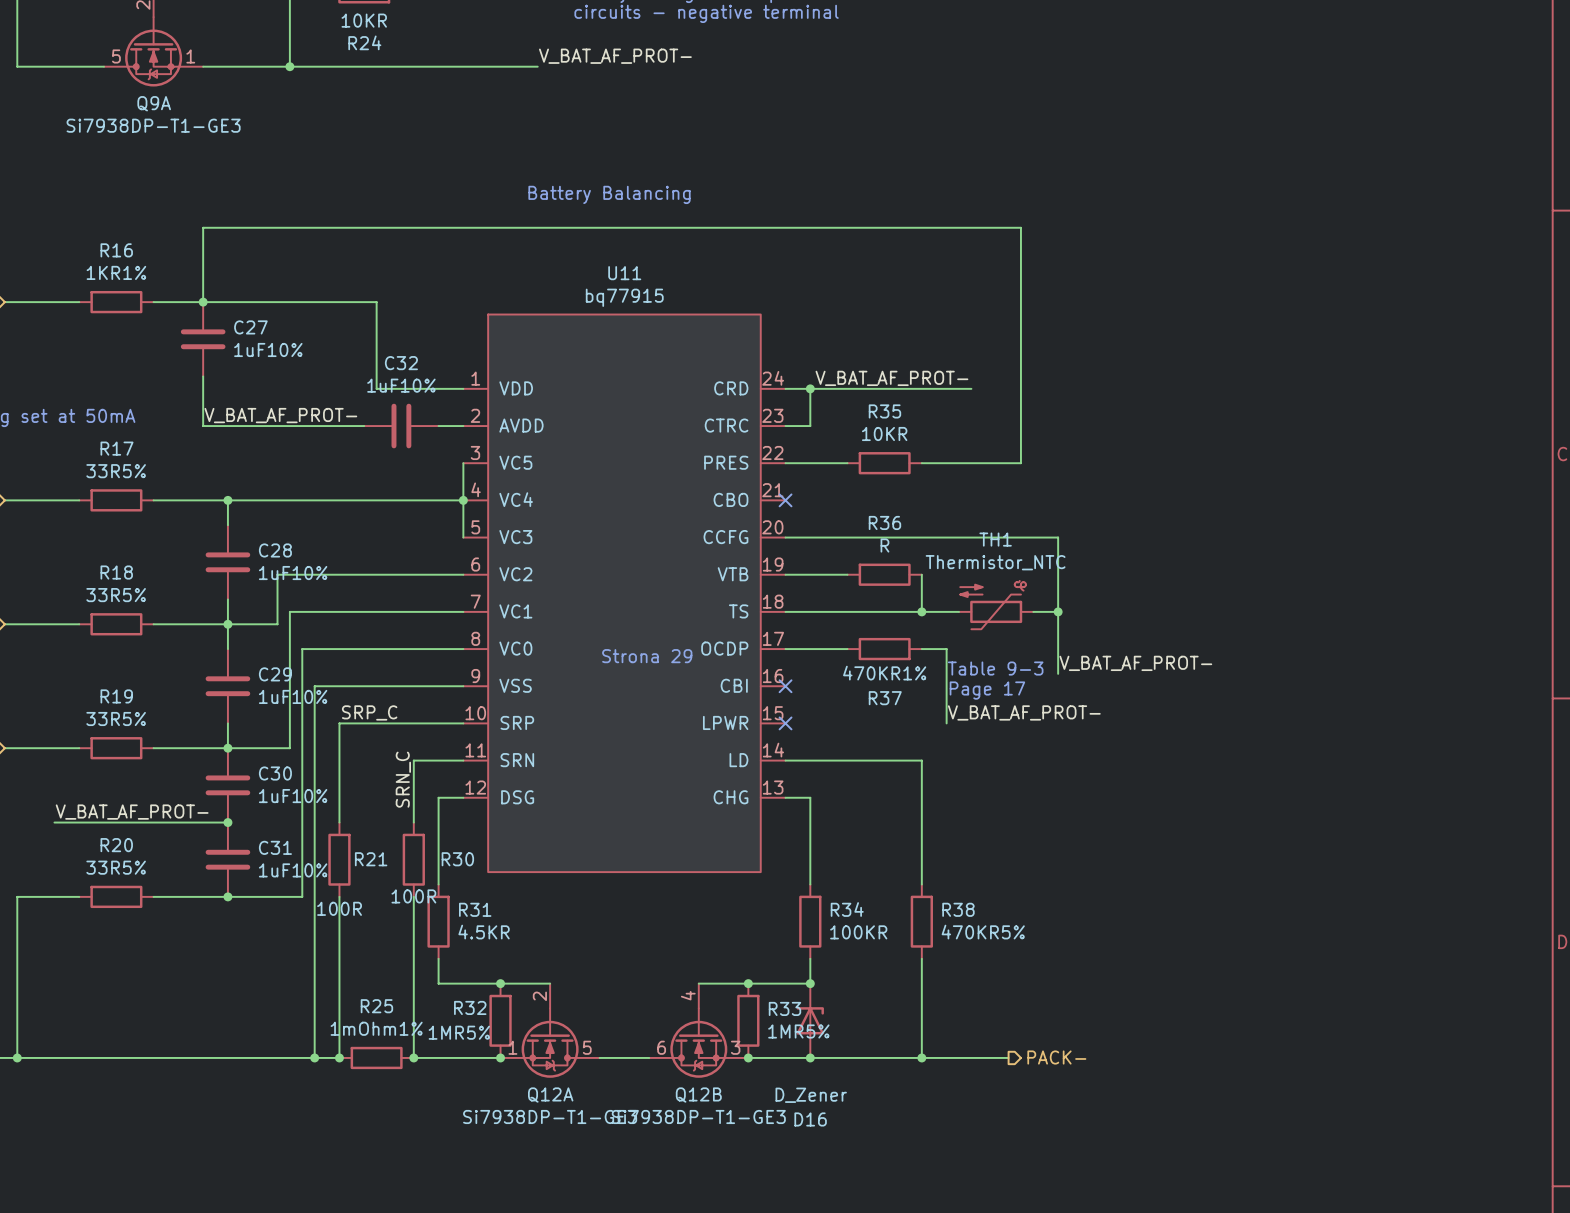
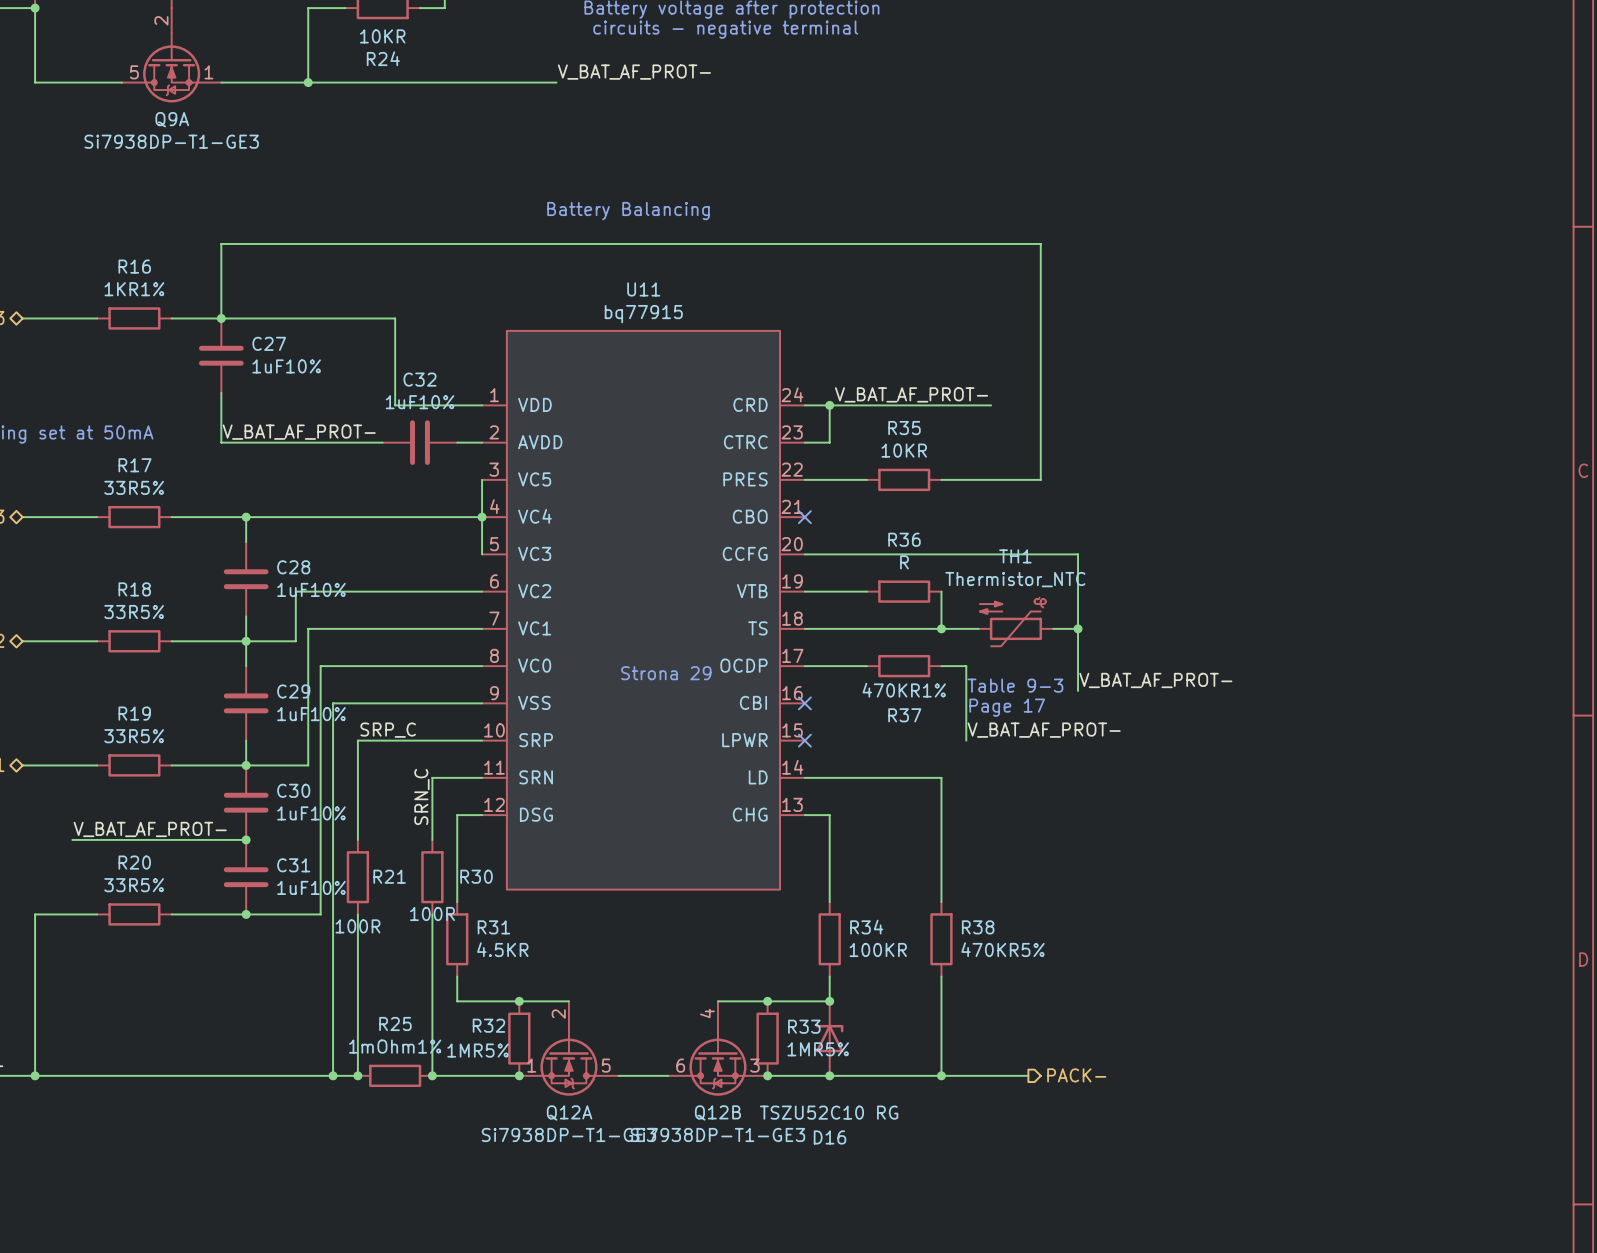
D16 value: D_Zener (811, 1095) -> TSZU52C10 RG (829, 1112)

